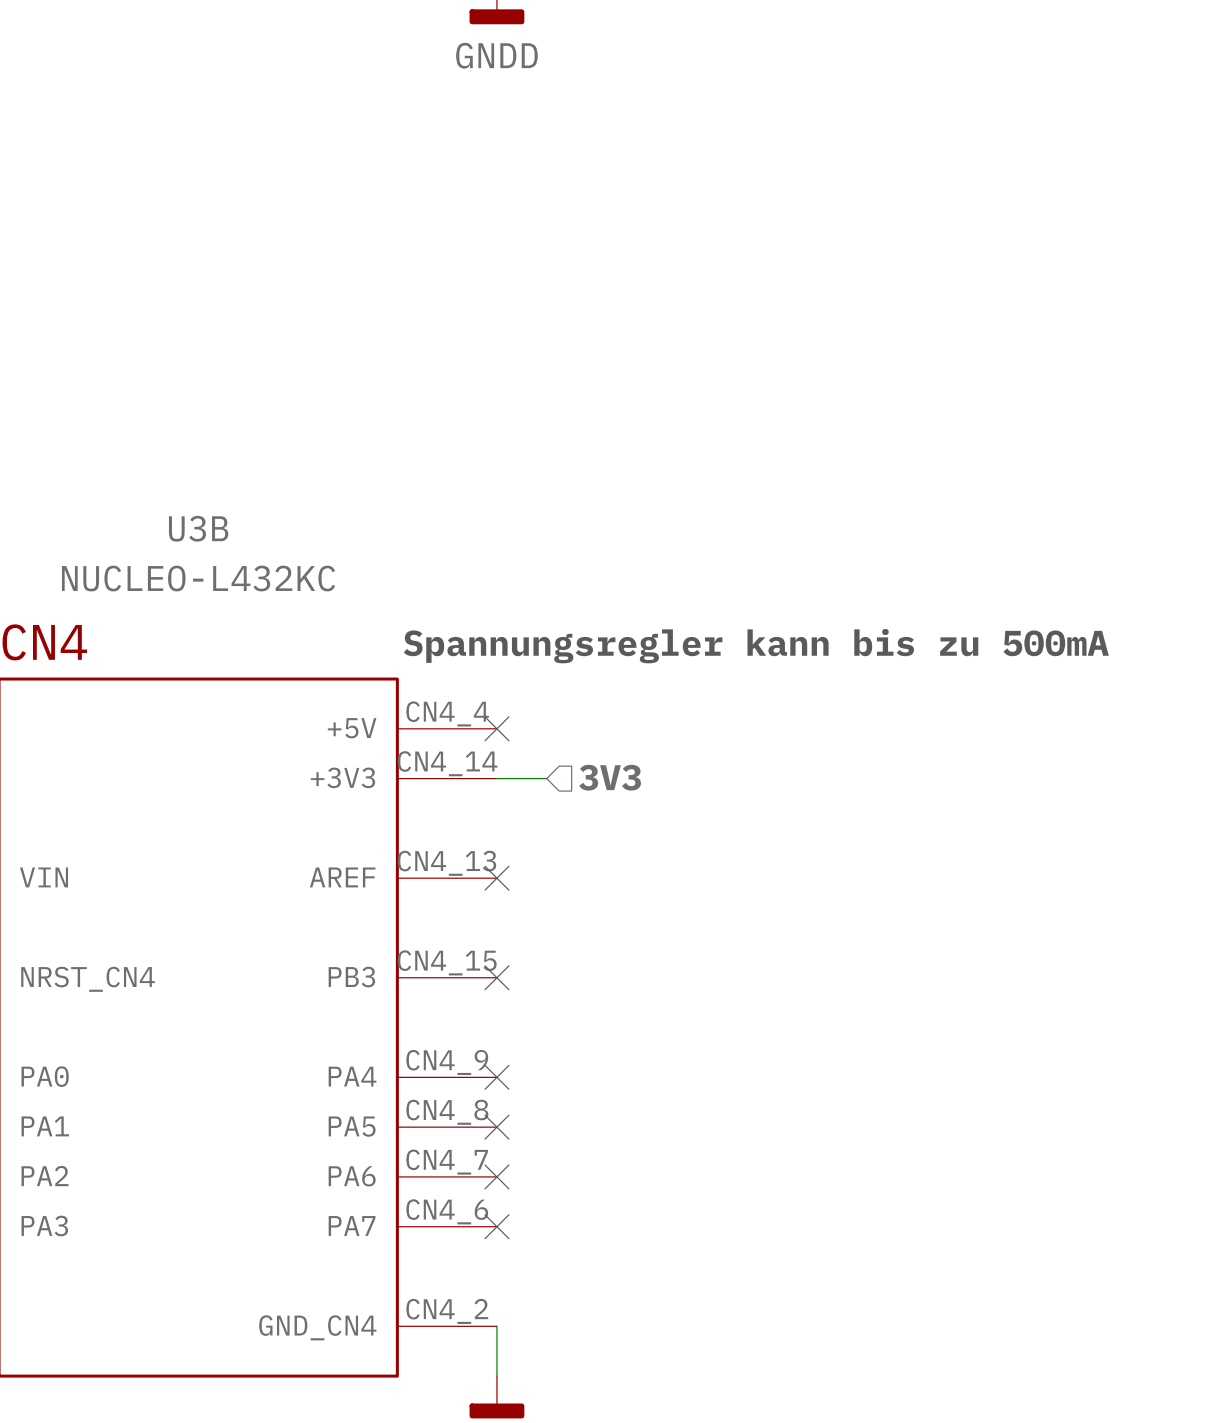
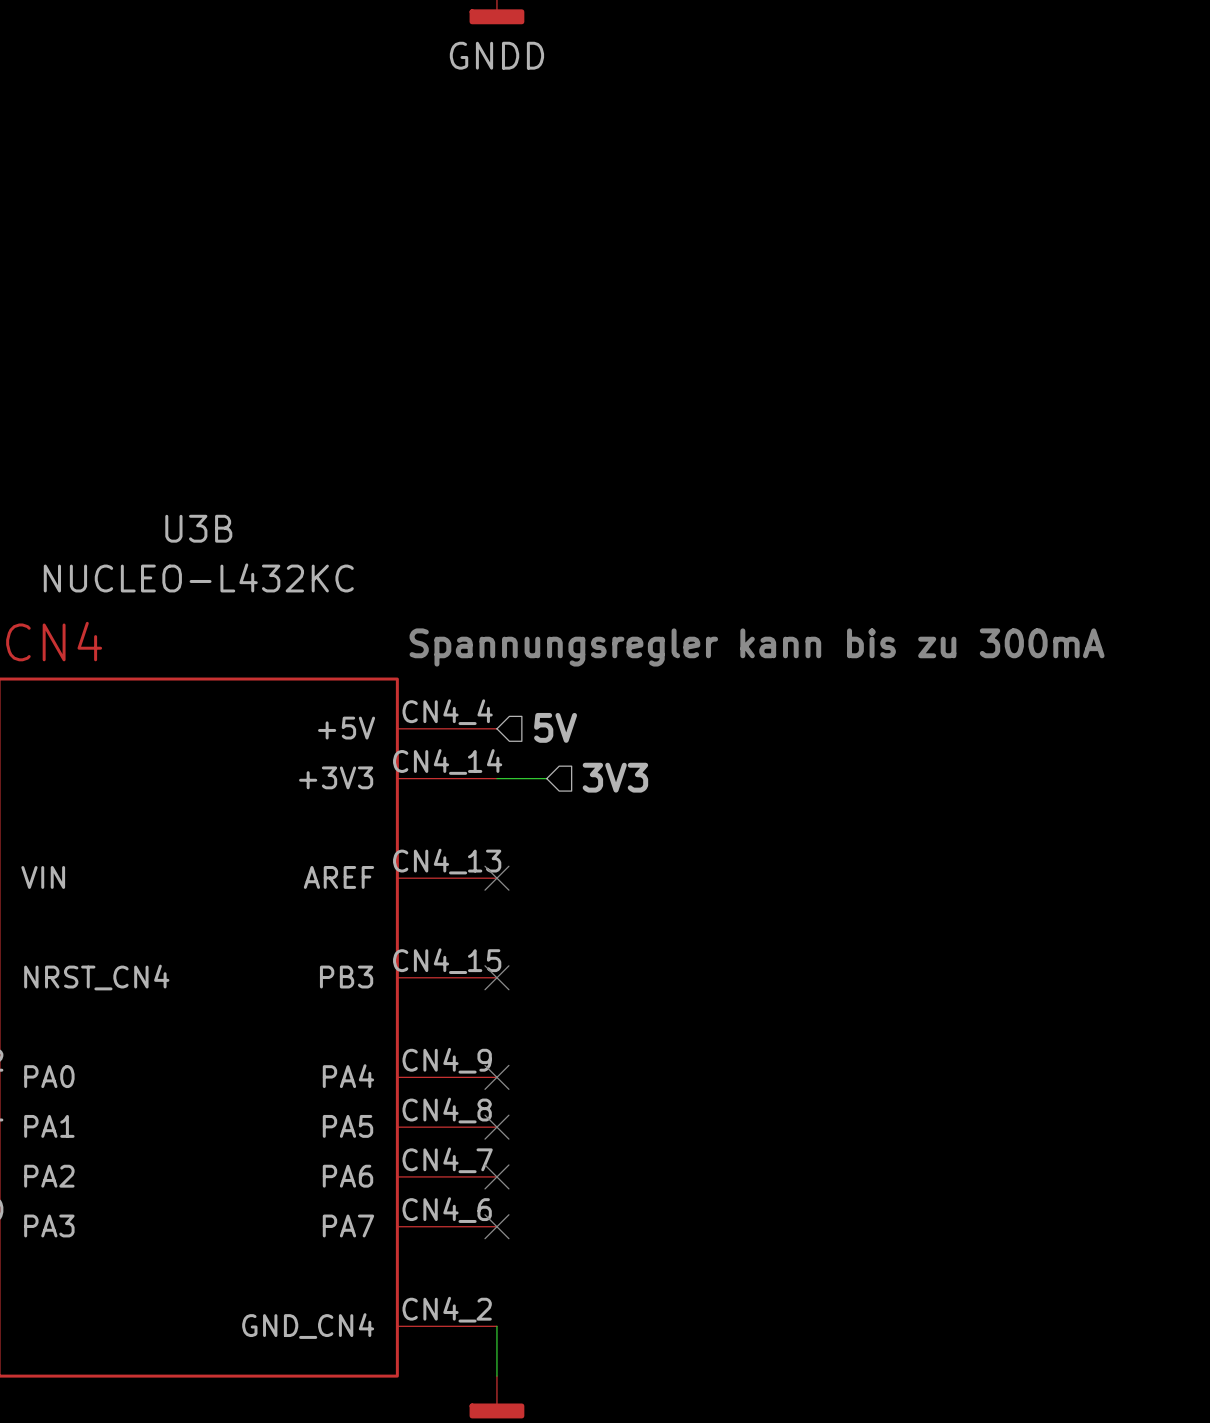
text: Spannungsregler kann bis zu 500mA (756, 646) -> Spannungsregler kann bis zu 300mA (757, 647)
no-connect mark: (496, 728) -> none
hierarchical label: none -> 5V (555, 727)

